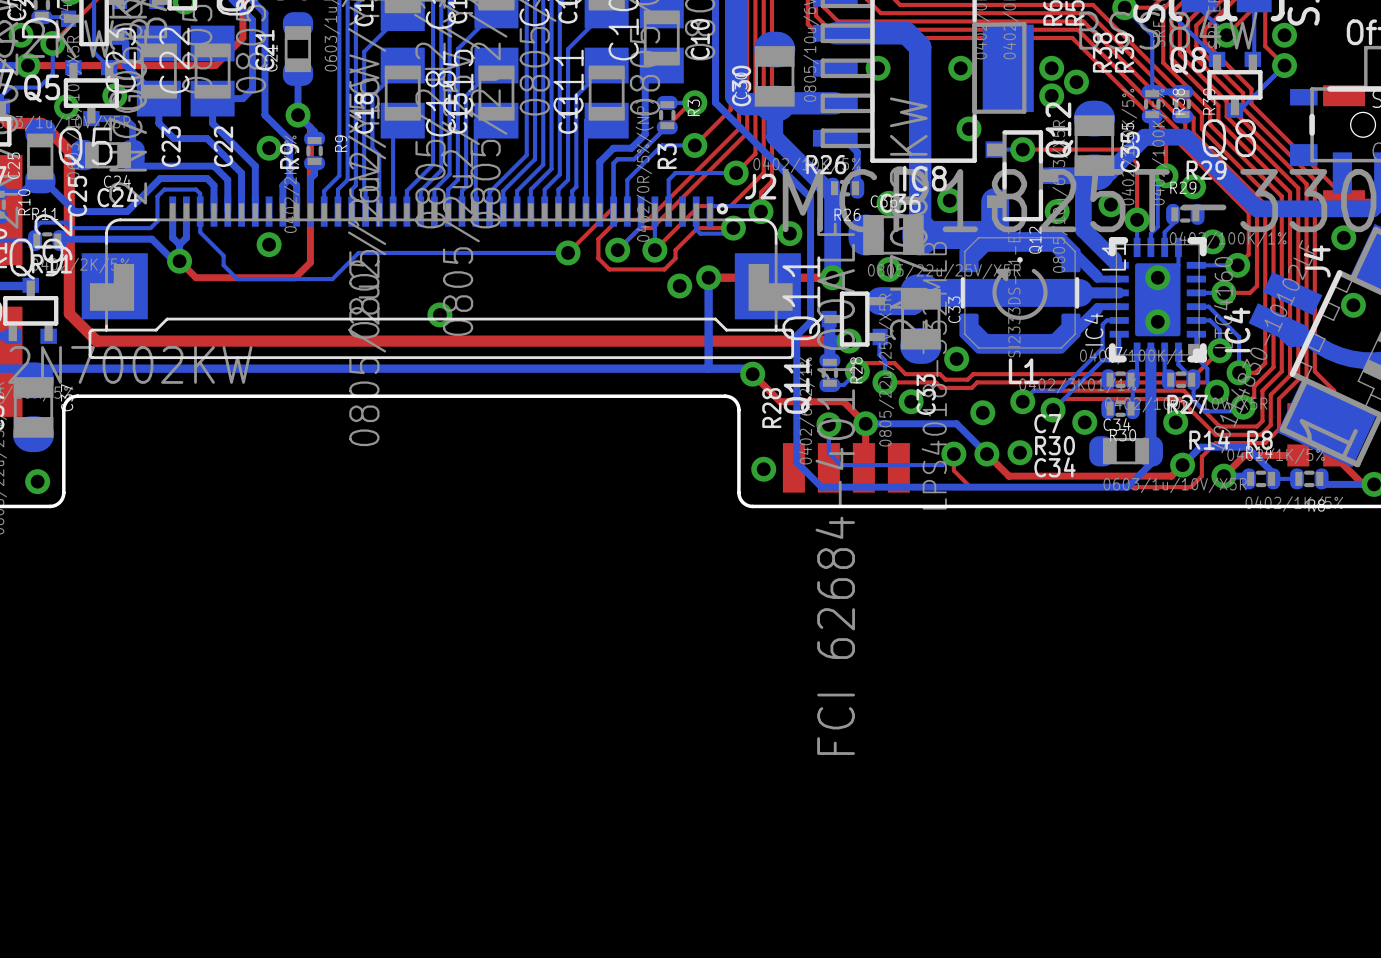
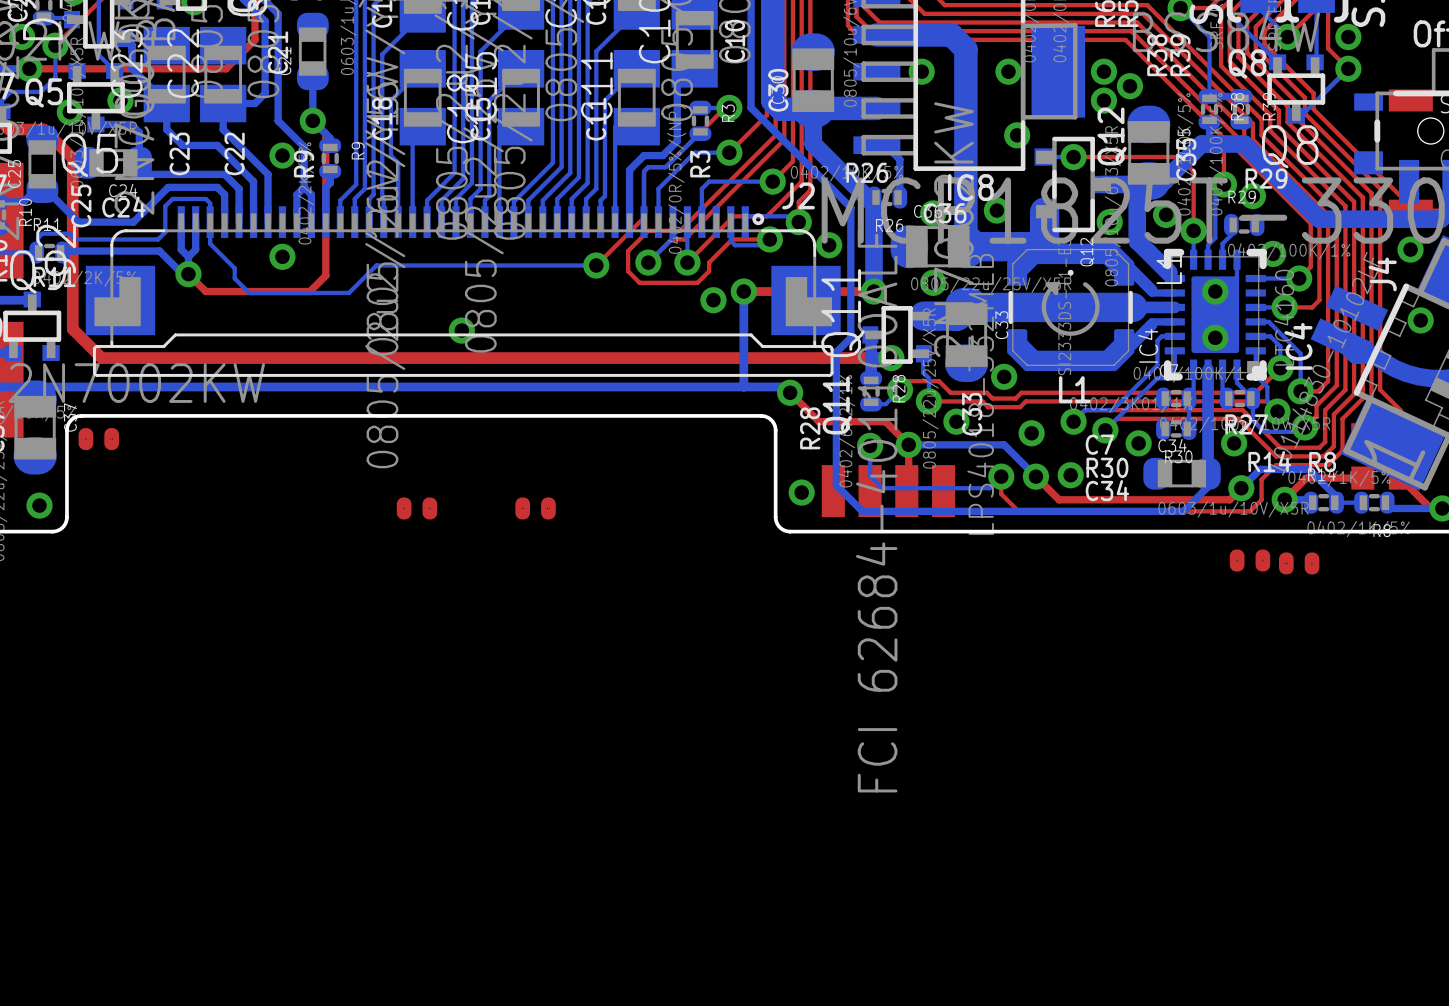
part: none -> (98, 439)
part: none -> (416, 508)
part: none -> (535, 508)
part: none -> (1250, 560)
part: none -> (1299, 563)

